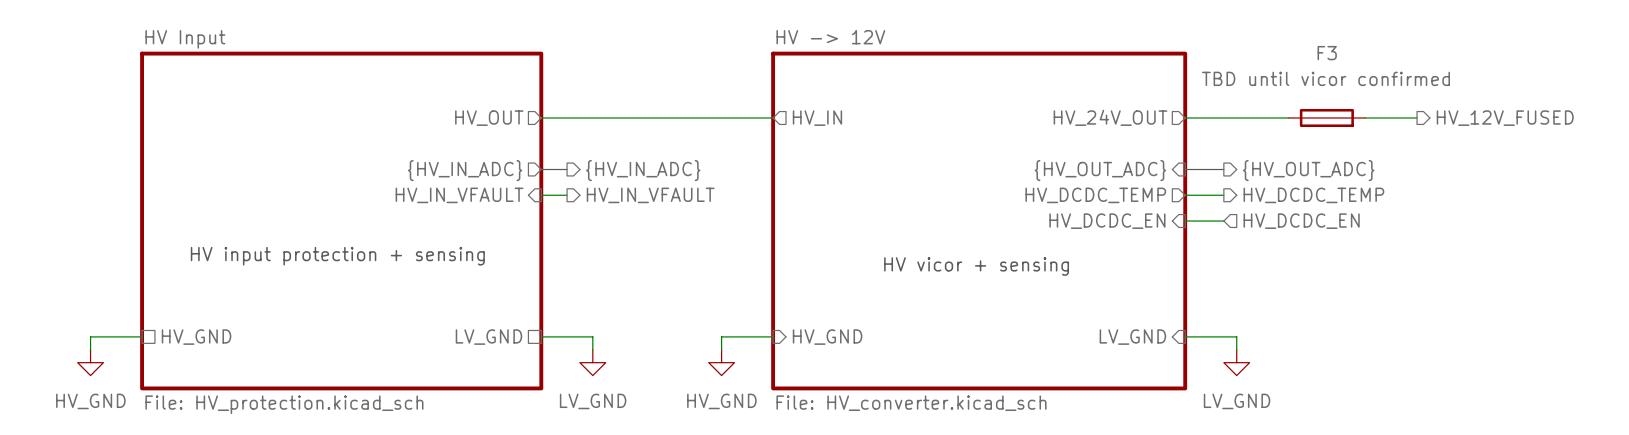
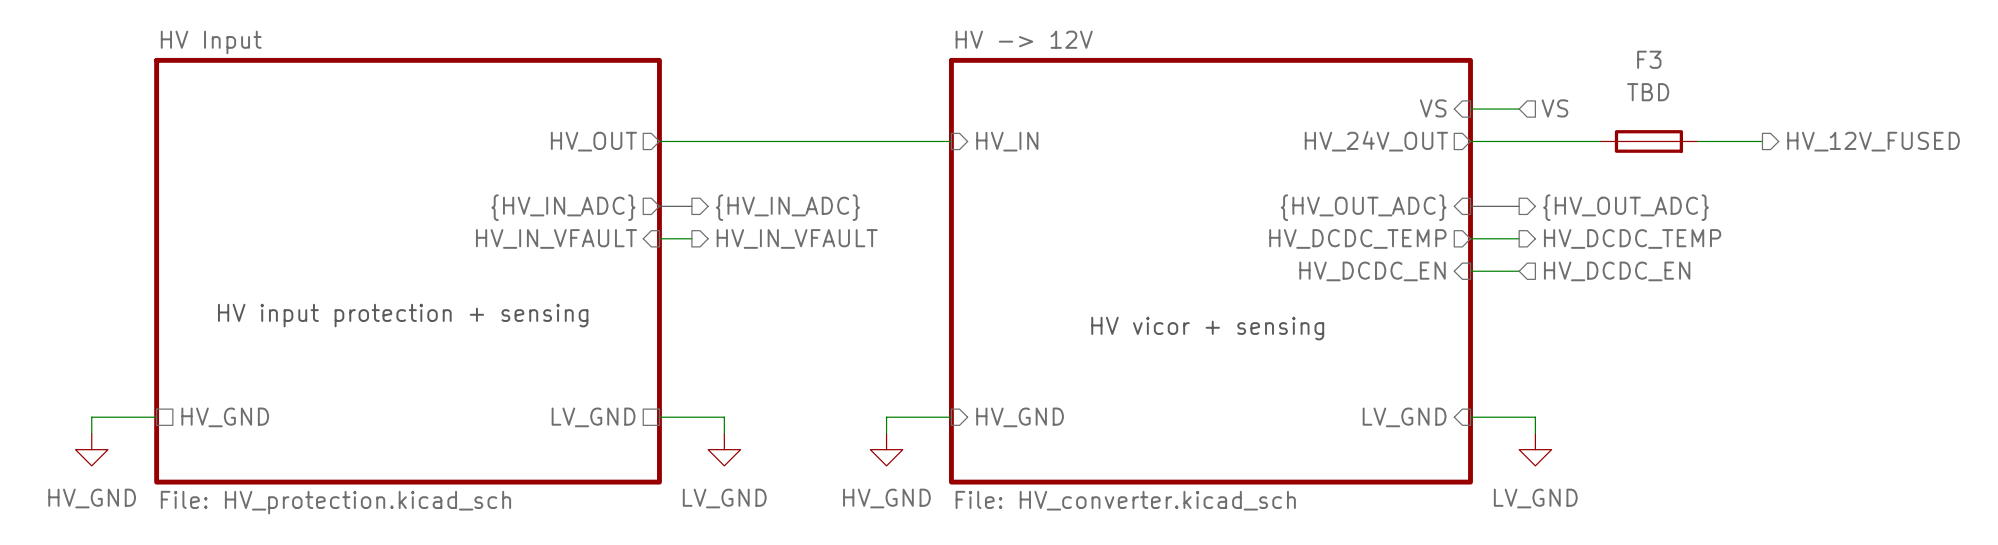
F3 value: TBD until vicor confirmed (1325, 78) -> TBD (1648, 92)
sheet pin: none -> VS (1433, 108)
hierarchical label: none -> VS (1554, 108)
wire: none -> (1470, 109) (1519, 109)
sheet pin shape: output (817, 118) -> input (1007, 141)

